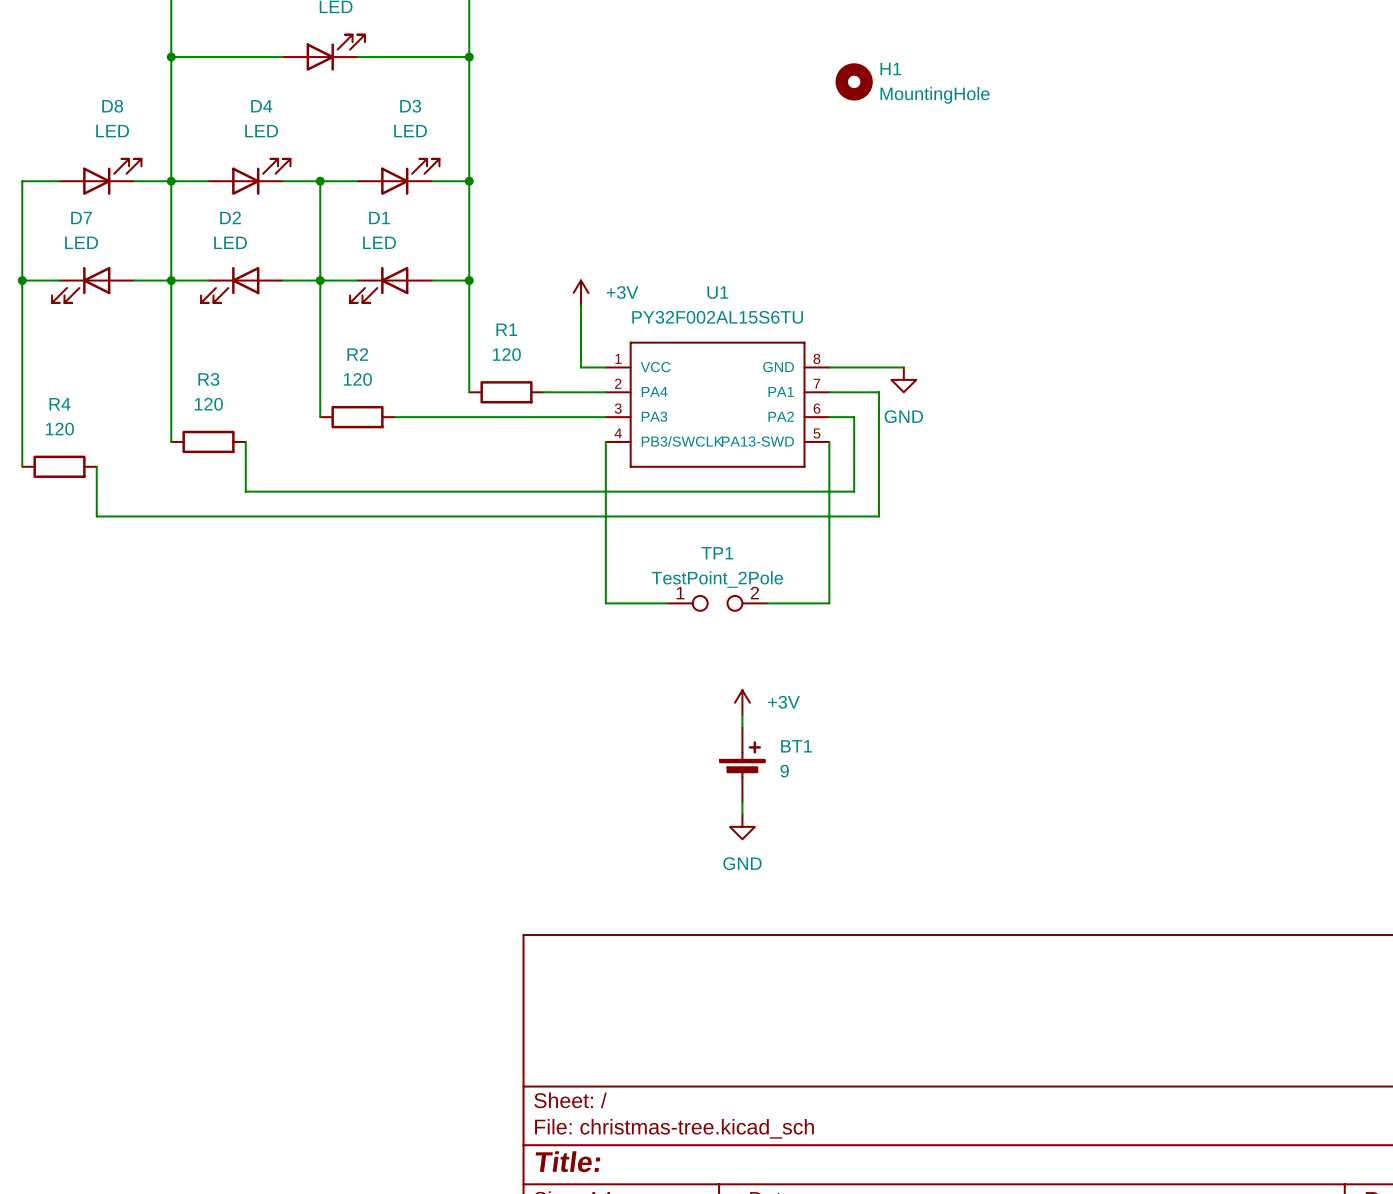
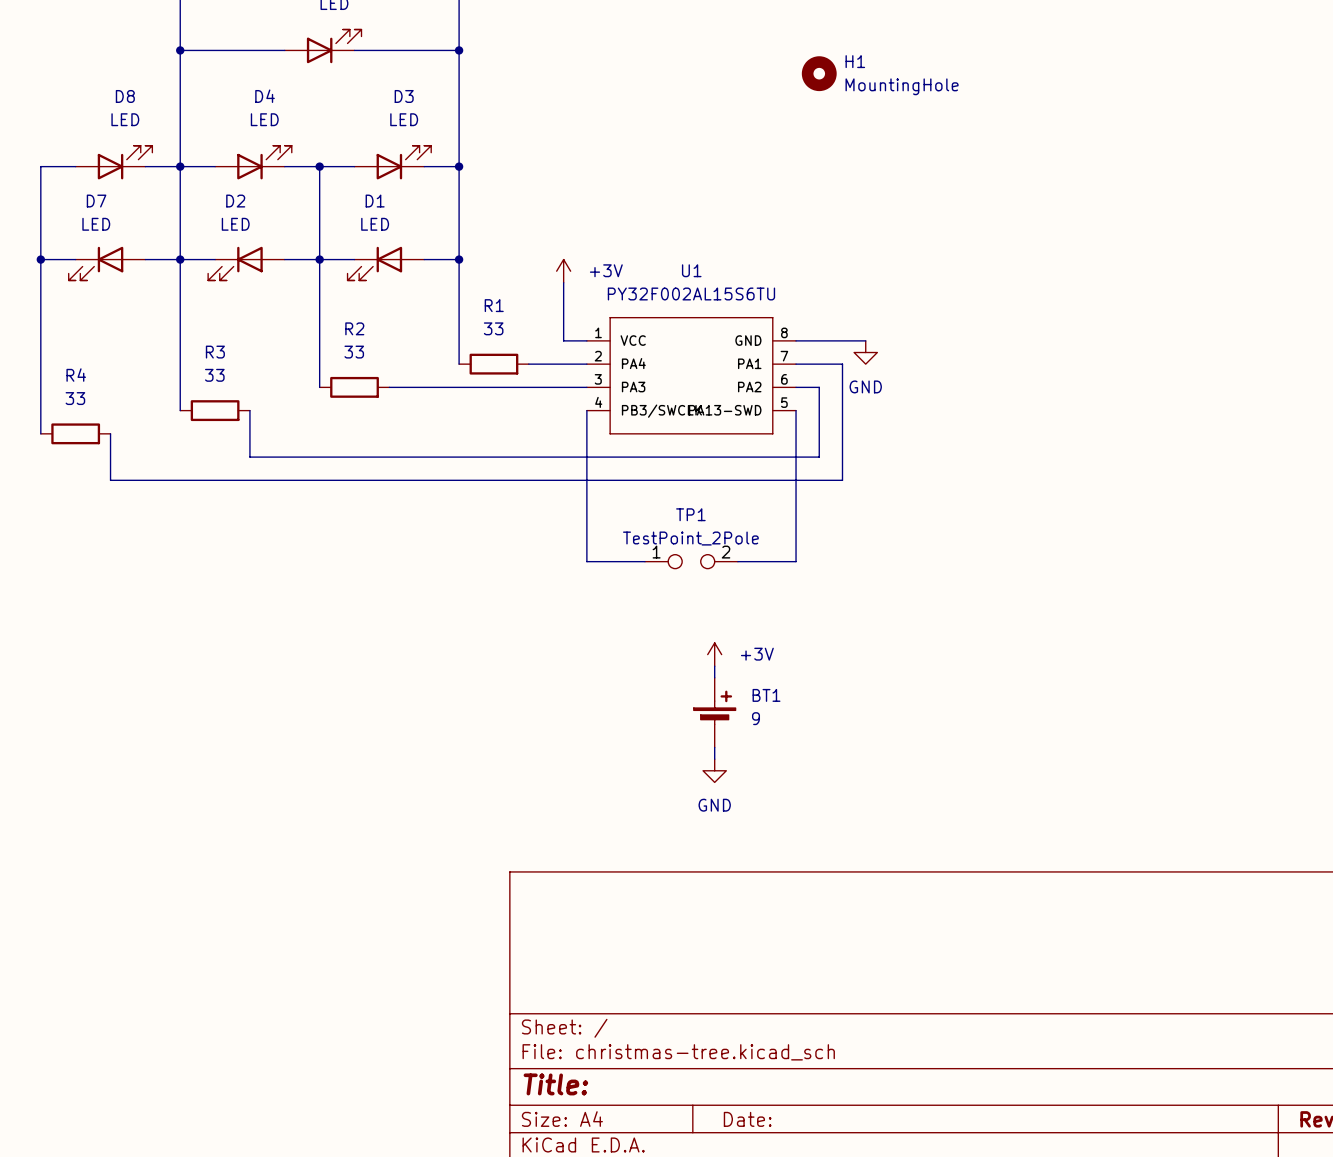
R1 value: 120 (506, 354) -> 33 (493, 328)
R2 value: 120 (357, 379) -> 33 (354, 352)
R3 value: 120 (208, 404) -> 33 (214, 375)
R4 value: 120 (59, 429) -> 33 (75, 398)

